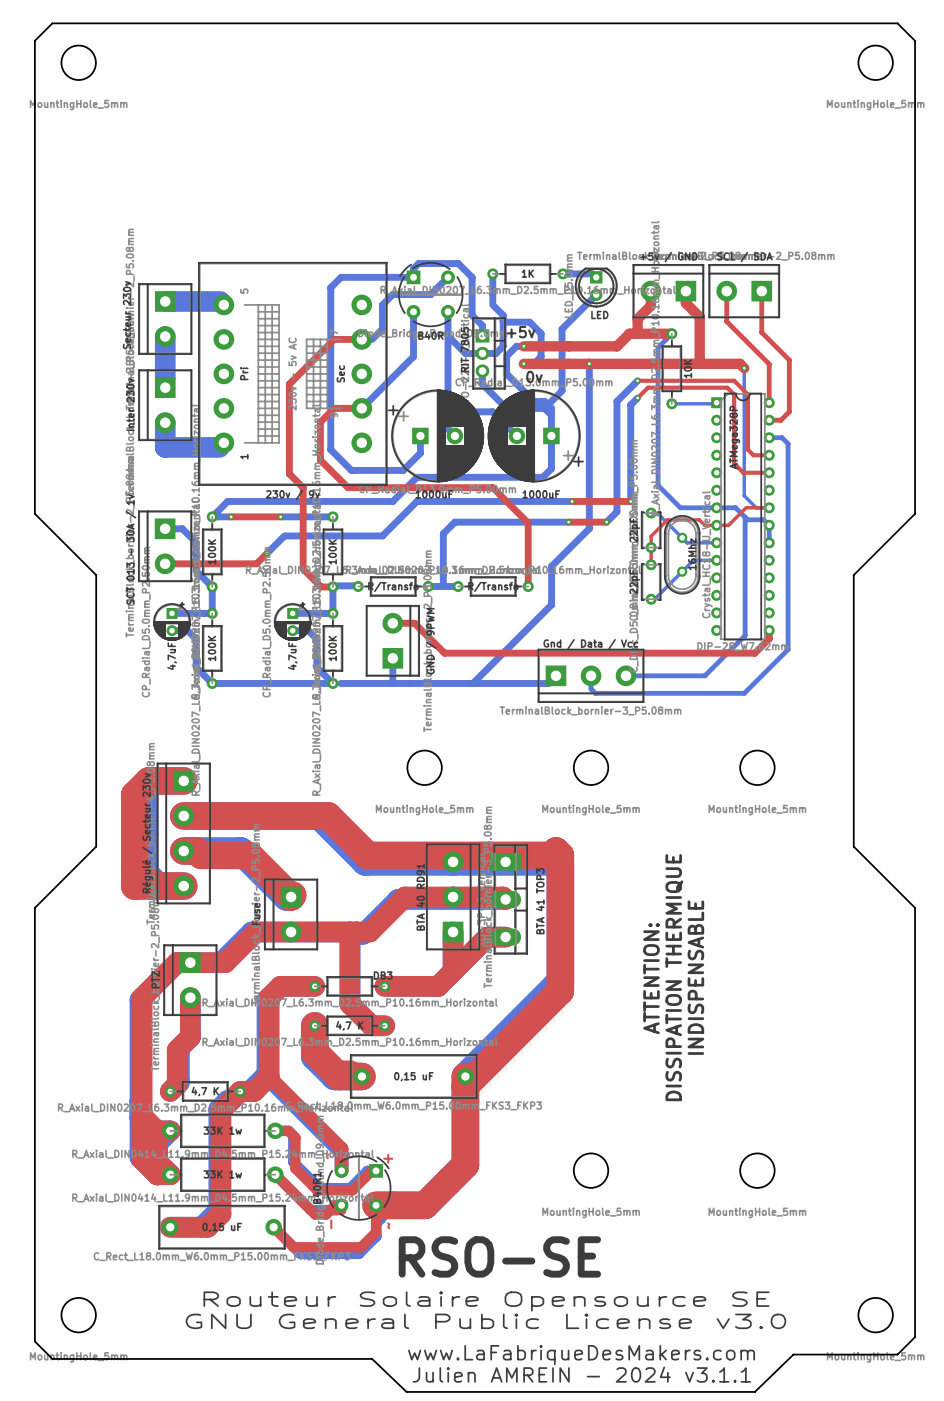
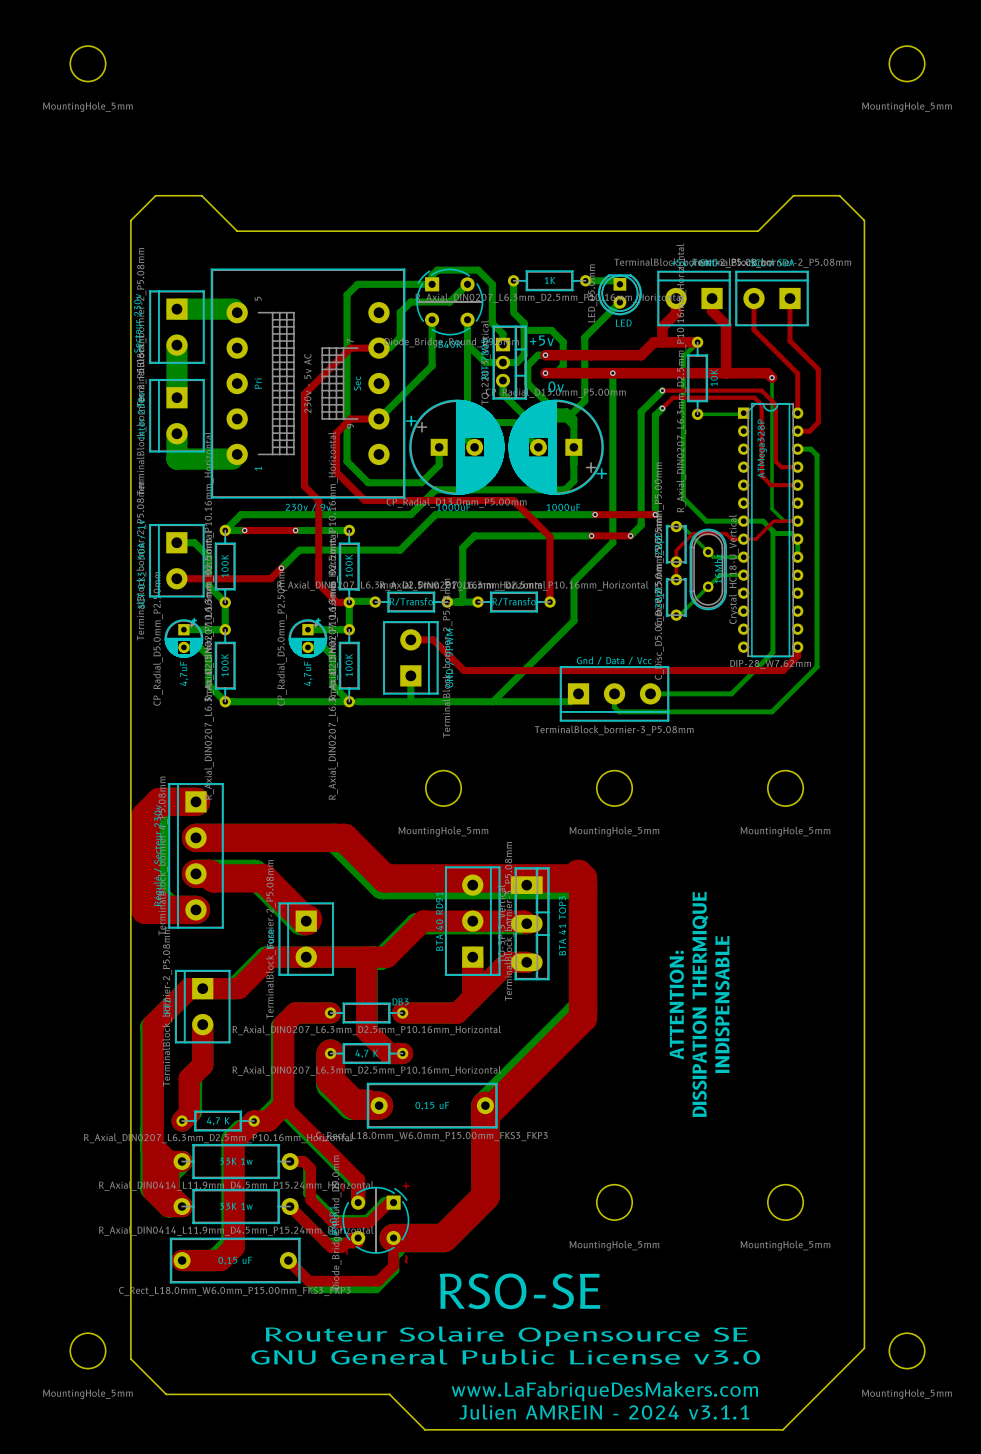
board edge: (406, 1391) (372, 1358) (52, 1358) (34, 1341) (34, 907) (96, 846) (96, 575) (34, 513) (34, 40) (52, 23) (897, 23) (915, 40) (915, 513) (853, 575) (853, 846) (915, 907) (915, 1337) (897, 1354) (793, 1354) (754, 1391) -> (425, 1429) (389, 1394) (166, 1394) (130, 1358) (130, 220) (155, 195) (201, 195) (237, 231) (758, 231) (793, 195) (839, 195) (864, 220) (864, 1348) (782, 1429)

